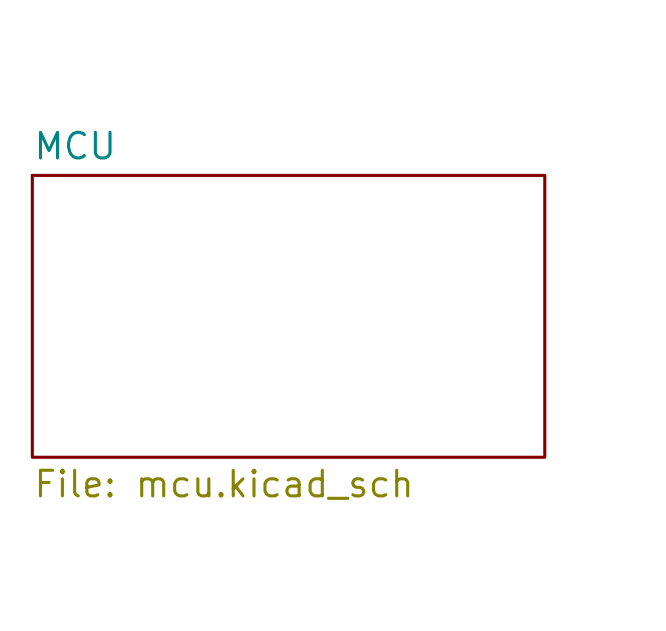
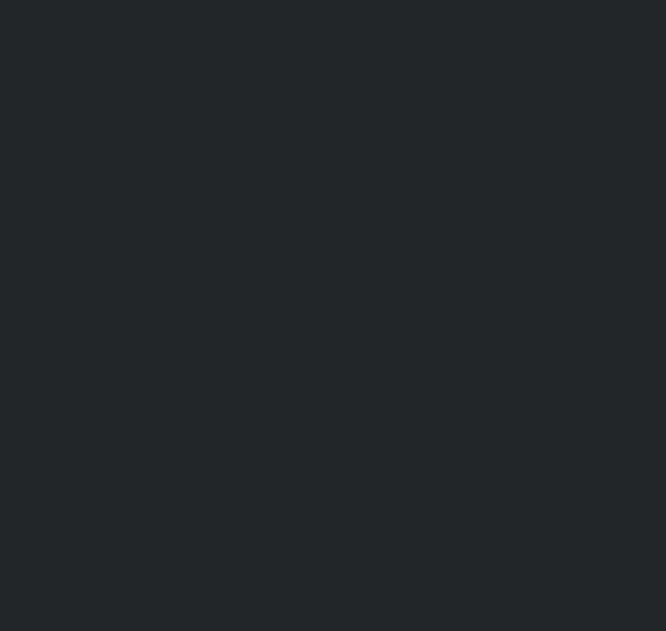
sheet MCU: File: mcu.kicad_sch (288, 316) -> none

